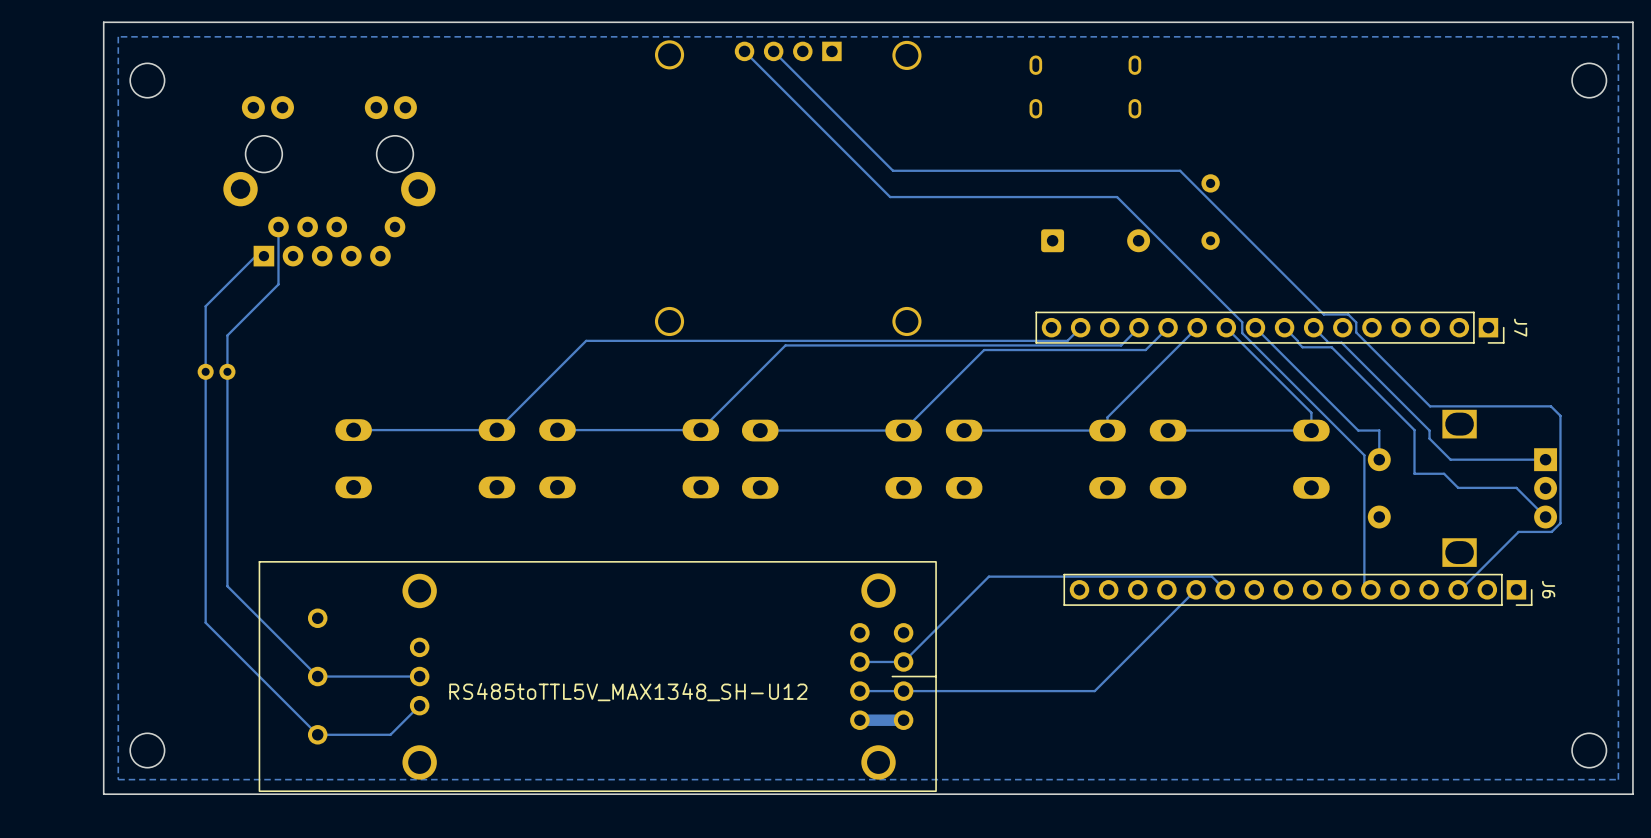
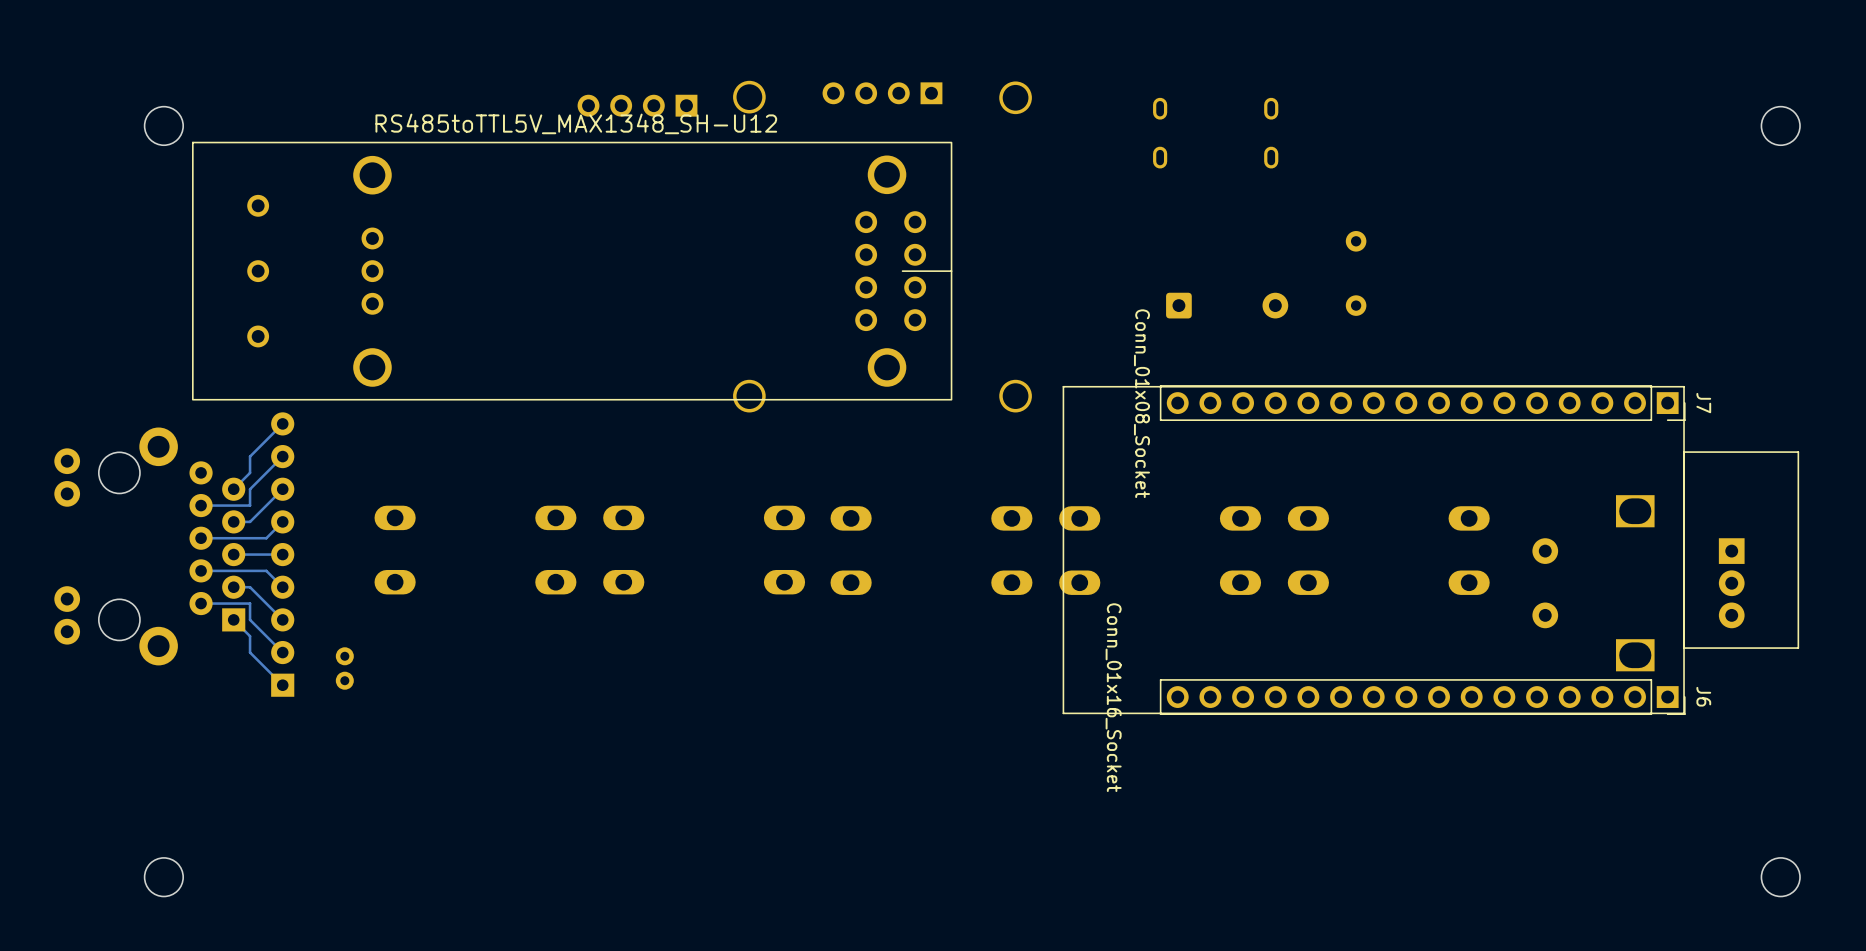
board edge: (1632, 22) (103, 22) (103, 794) (1632, 794) (1632, 22) -> none
zone outline: (1618, 36) (118, 36) (118, 779) (1618, 779) (1618, 36) -> none
track: (744, 51) (890, 197) (1117, 197) (1242, 322) (1242, 333) (1364, 455) (1364, 583) (1370, 589) -> none
track: (773, 51) (893, 170) (1180, 170) (1323, 314) (1348, 314) (1356, 322) (1356, 332) (1430, 406) (1550, 406) (1560, 415) (1560, 523) (1551, 531) (1518, 531) (1460, 589) -> none
part: none -> (637, 105)
part: (329, 181) -> none
track: (278, 226) (278, 284) (227, 335) (227, 586) (317, 676) (419, 676) -> none
track: (263, 256) (255, 256) (205, 306) (205, 622) (317, 734) (390, 734) (419, 705) -> none
line: none -> (1684, 386) (1684, 713) (1063, 713) (1063, 386) (1684, 386)
track: (1080, 327) (1067, 340) (586, 340) (496, 430) (353, 430) -> none
track: (1138, 327) (1121, 345) (785, 345) (700, 430) (557, 430) -> none
track: (1168, 327) (1145, 350) (984, 350) (903, 430) (760, 430) -> none
track: (1197, 327) (1107, 417) (1107, 430) (964, 430) -> none
track: (1226, 327) (1311, 412) (1311, 430) (1168, 430) -> none
track: (1255, 327) (1358, 430) (1379, 430) (1379, 459) -> none
track: (1284, 327) (1302, 347) (1331, 347) (1414, 430) (1414, 473) (1444, 473) (1458, 487) (1516, 487) (1545, 517) -> none
track: (1313, 327) (1327, 342) (1341, 342) (1429, 430) (1429, 438) (1450, 459) (1545, 459) -> none
J7 value: none -> Conn_01x08_Socket (1141, 403)
part rotation: 0° (216, 371) -> 90° clockwise (344, 668)
part position: (216, 371) -> (344, 668)
line: none -> (1684, 452) (1798, 452) (1798, 648) (1684, 648)
part: none -> (174, 554)
track: (1196, 589) (1094, 691) (859, 691) -> none
track: (1225, 589) (1211, 576) (988, 576) (903, 661) (859, 661) -> none
J6 position: (1297, 589) -> (1422, 697)
J6 value: none -> Conn_01x16_Socket (1113, 697)
RS485toTTL5V_MAX1348_SH-U12 position: (597, 676) -> (572, 271)
RS485toTTL5V_MAX1348_SH-U12 name position: RS485toTTL5V_MAX1348_SH-U12 (628, 692) -> RS485toTTL5V_MAX1348_SH-U12 (576, 123)
track: (903, 720) (859, 720) -> none

